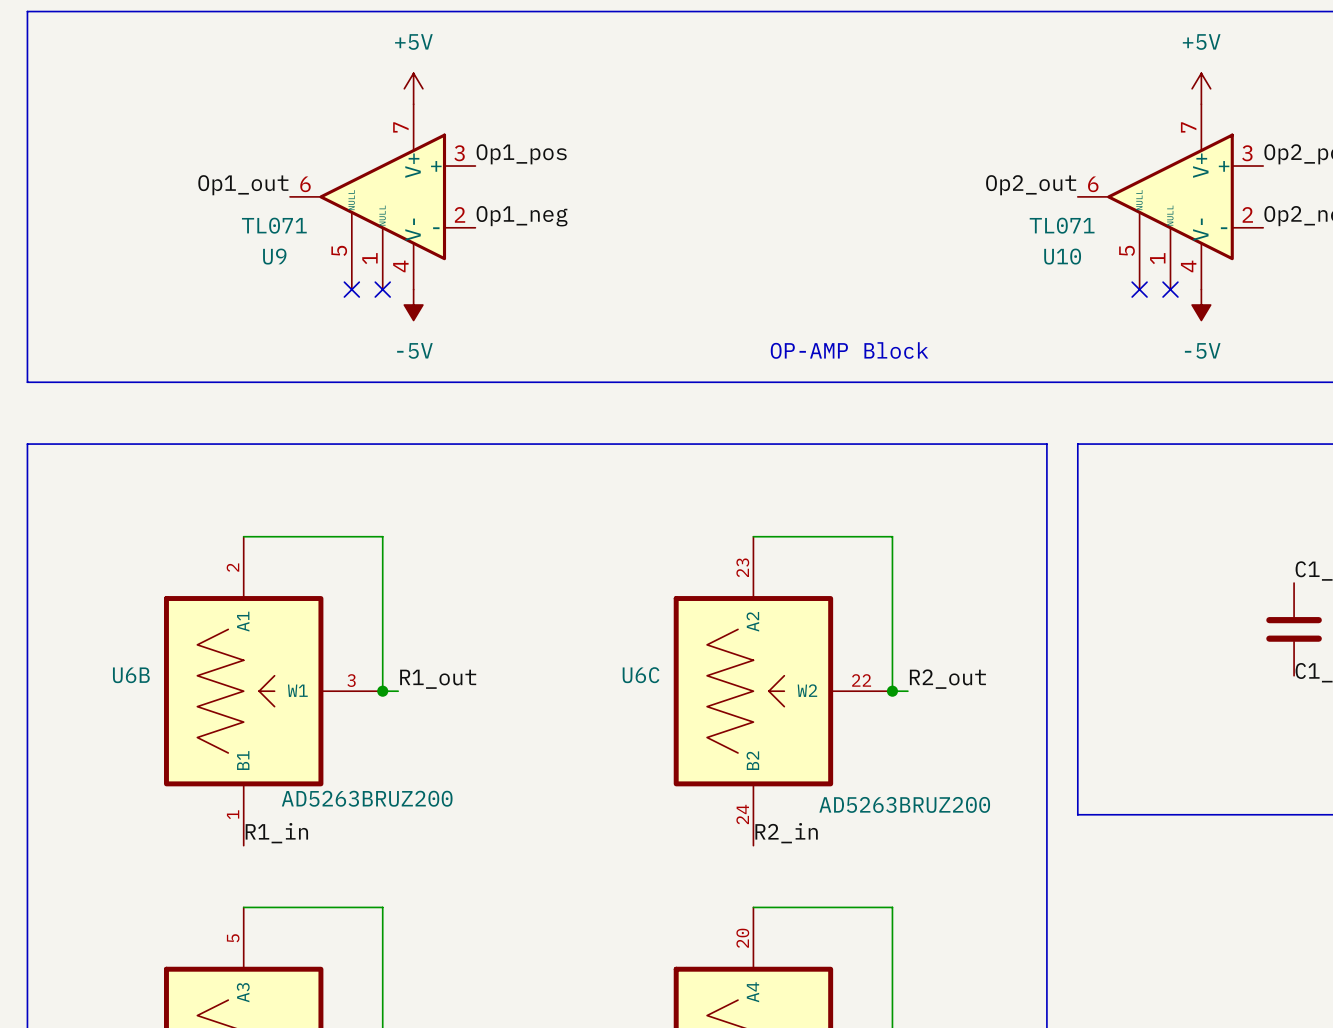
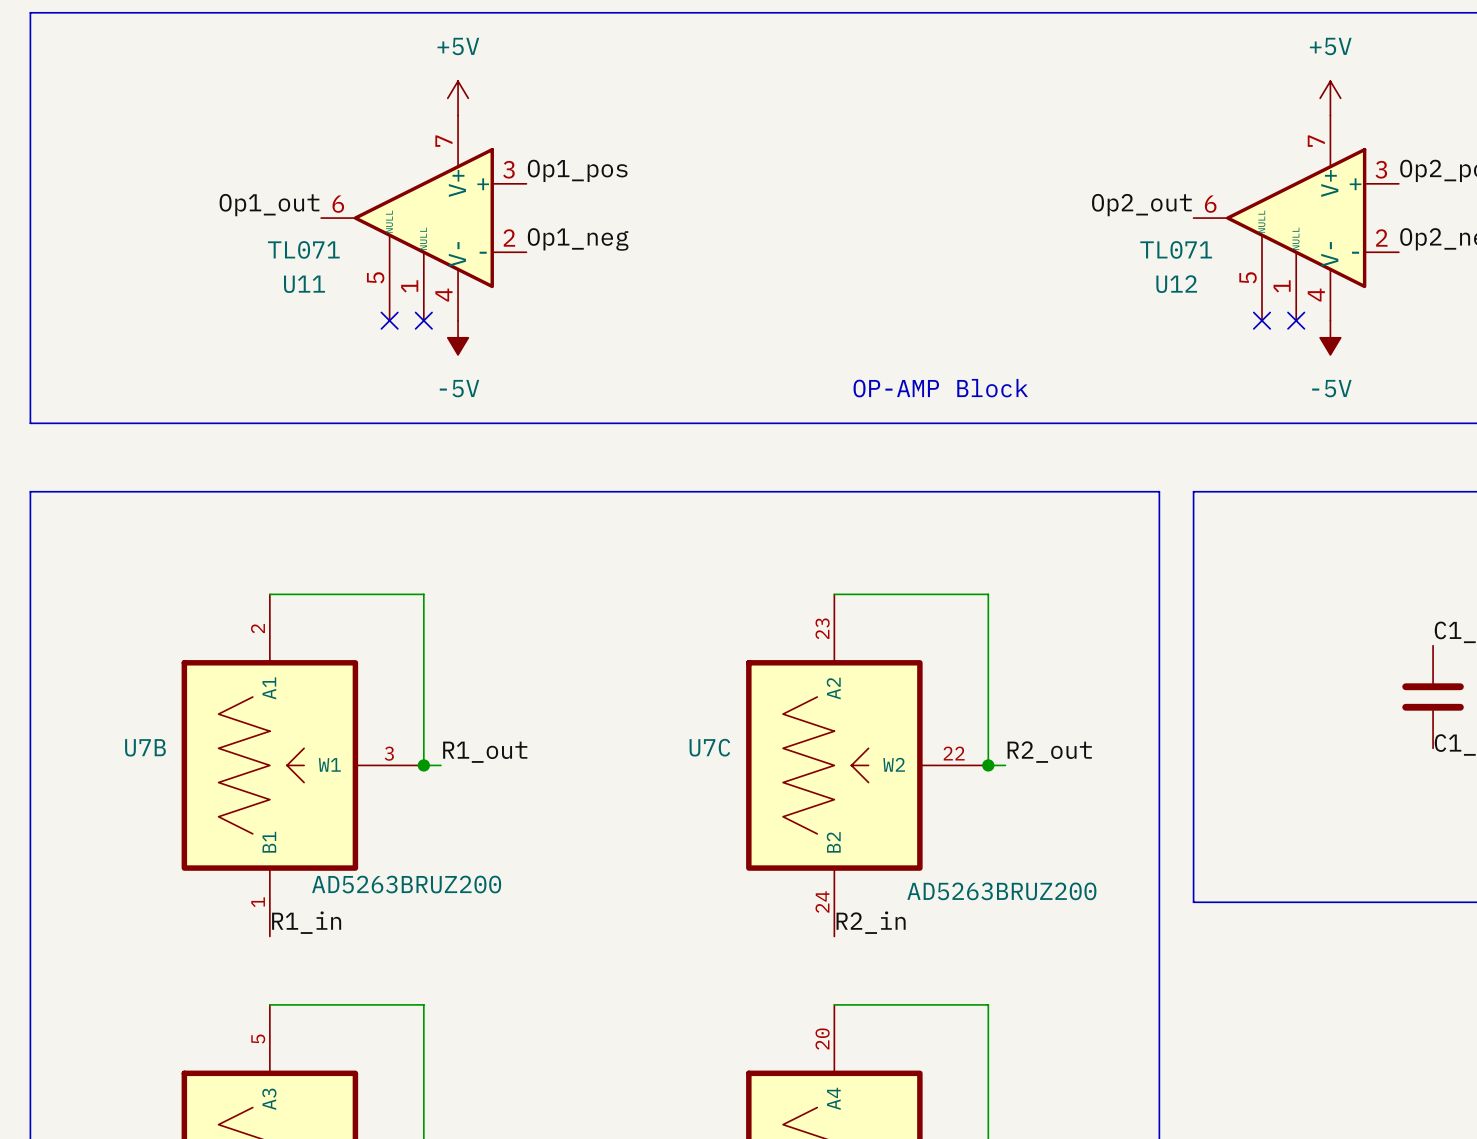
U9 name: U9 (274, 256) -> U11 (304, 284)
U10 name: U10 (1062, 256) -> U12 (1176, 284)
U6B name: U6B (131, 675) -> U7B (145, 747)
U6C name: U6C (641, 675) -> U7C (709, 747)

